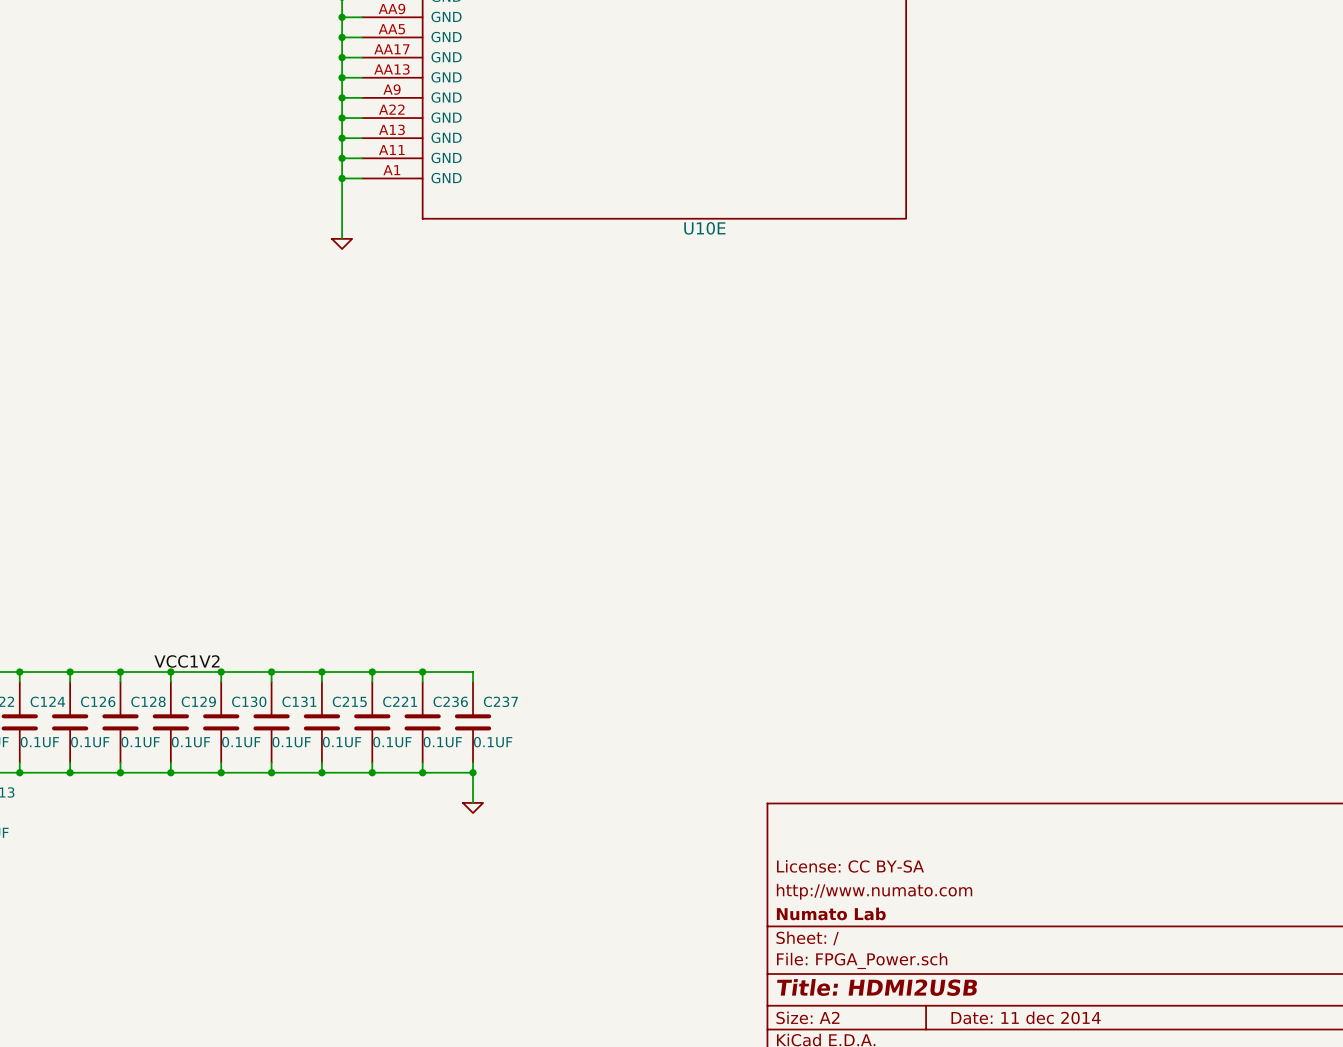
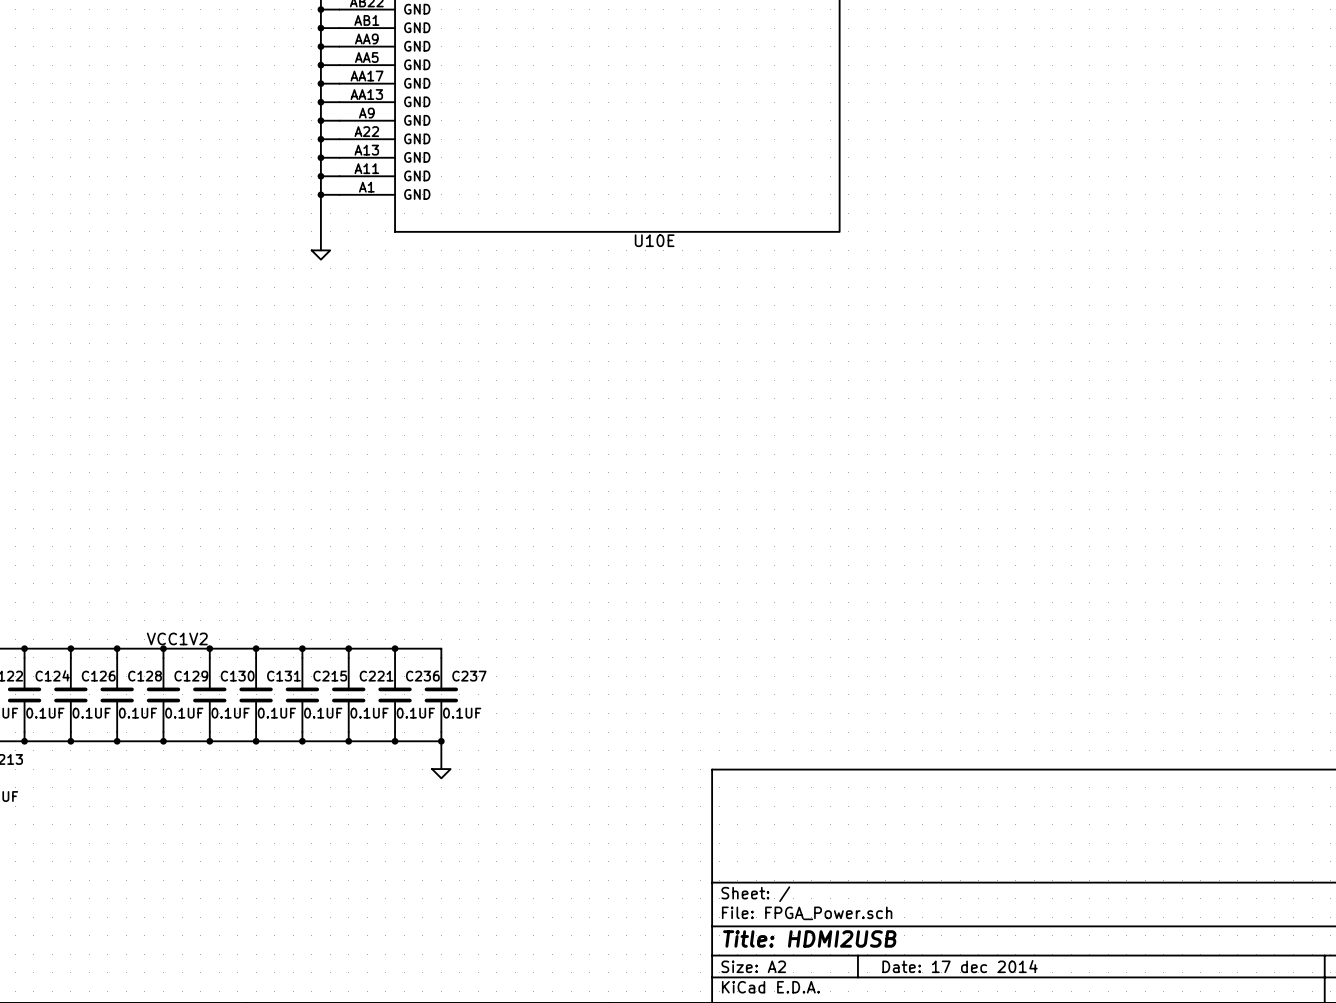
title block: License: CC BY-SA (850, 866) -> none
title block: http://www.numato.com (874, 891) -> none
title block: Numato Lab (831, 913) -> none
title block: Date: 11 dec 2014 (1026, 1017) -> Date: 17 dec 2014 (960, 966)

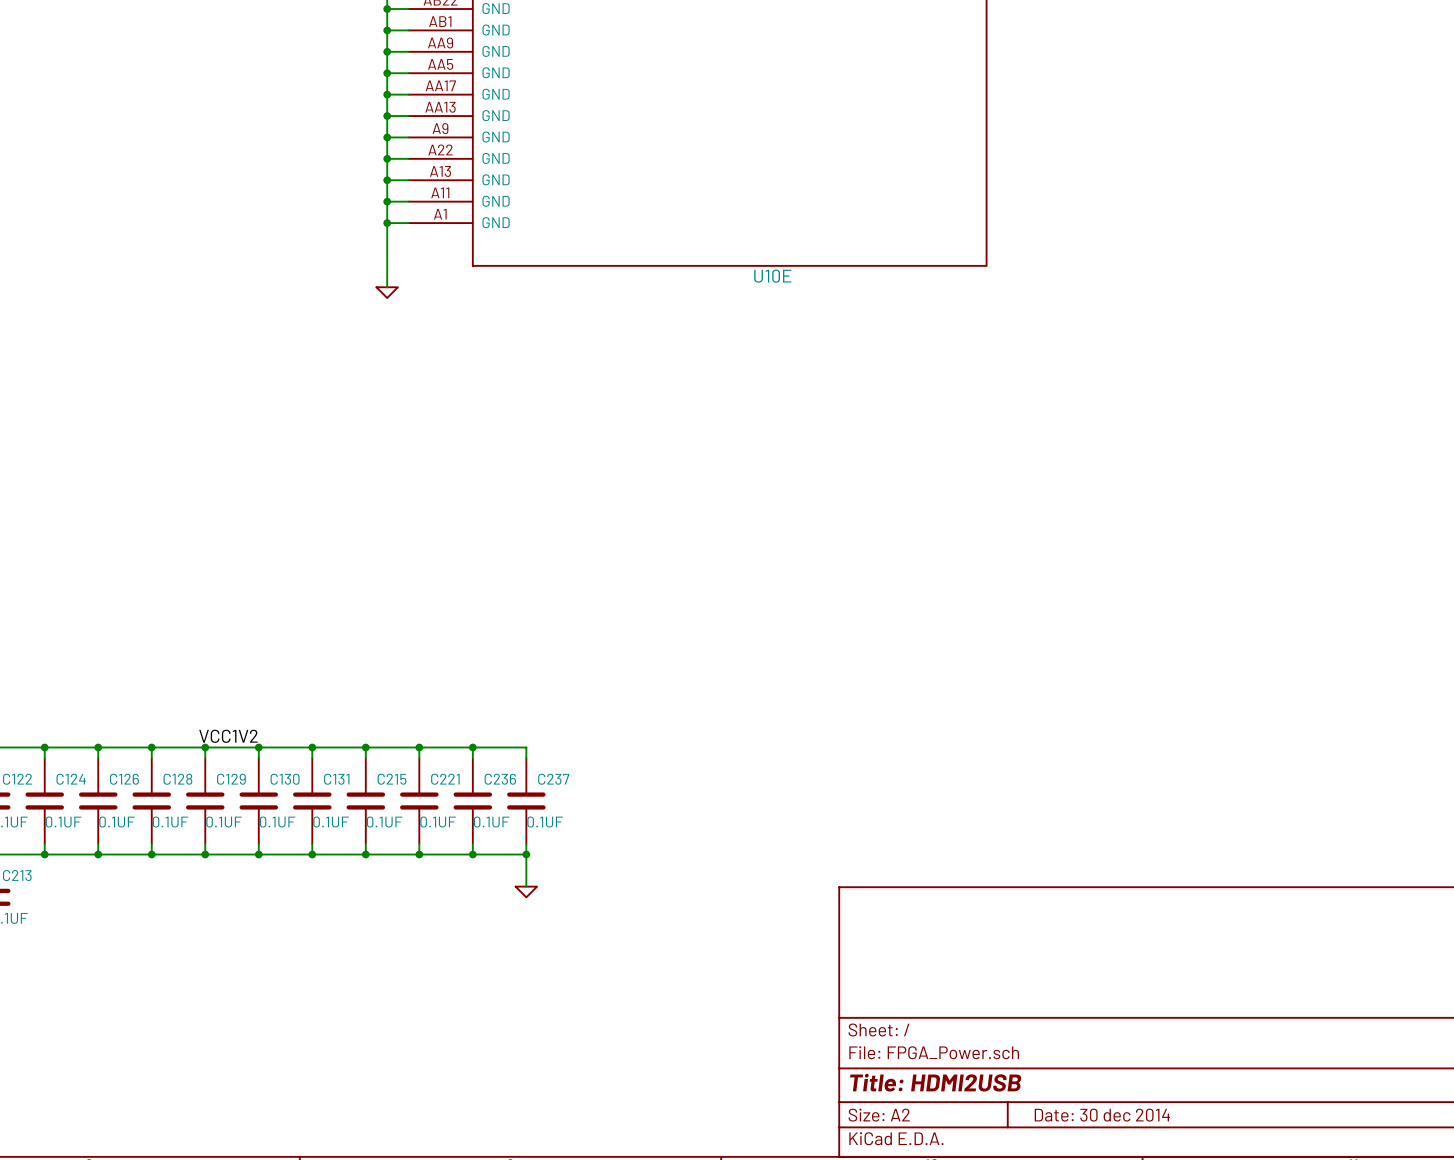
title block: Date: 17 dec 2014 (960, 966) -> Date: 30 dec 2014 (1102, 1115)

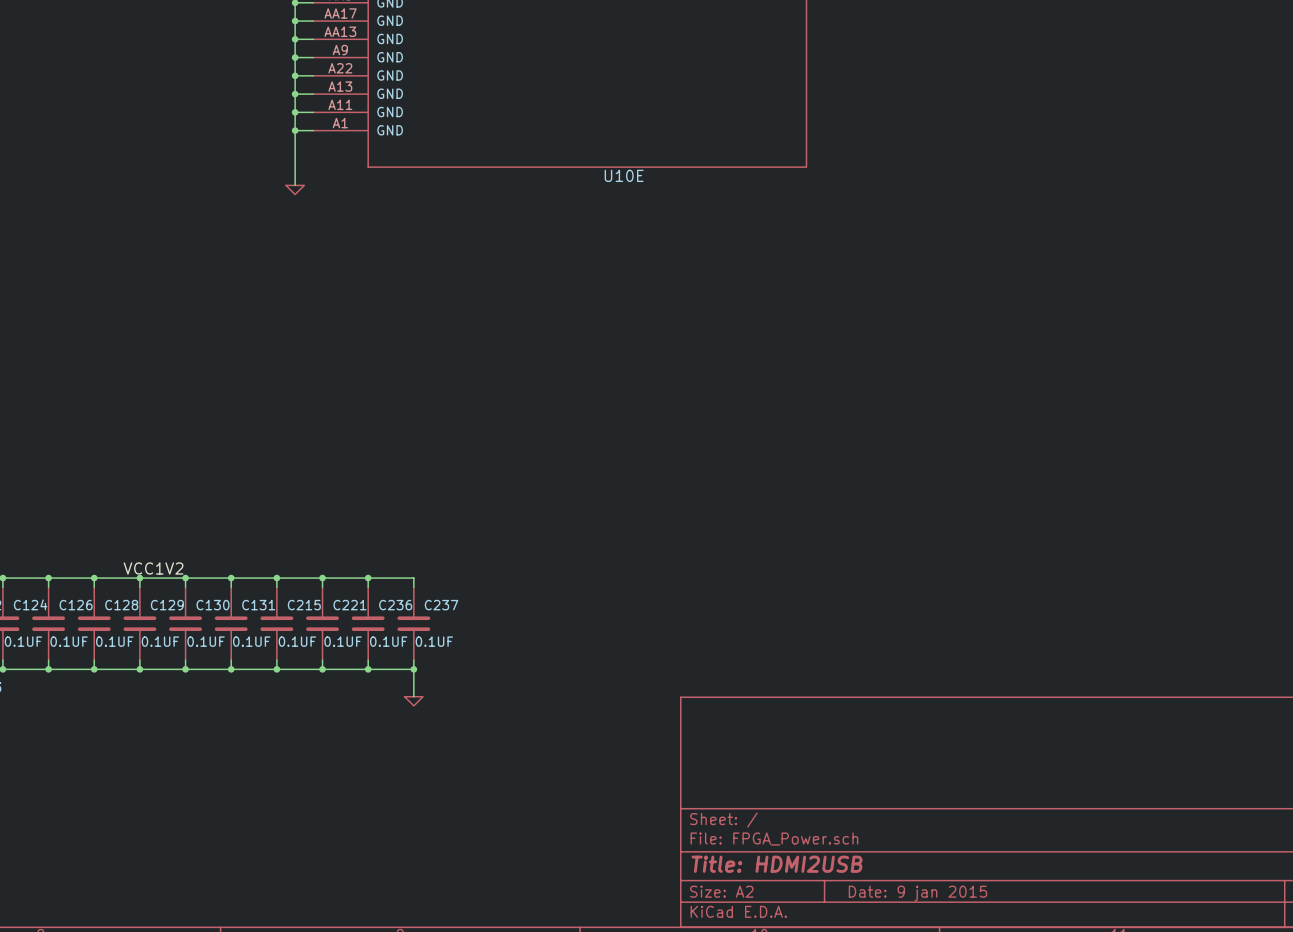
title block: Date: 30 dec 2014 (1102, 1115) -> Date: 9 jan 2015 (917, 893)

